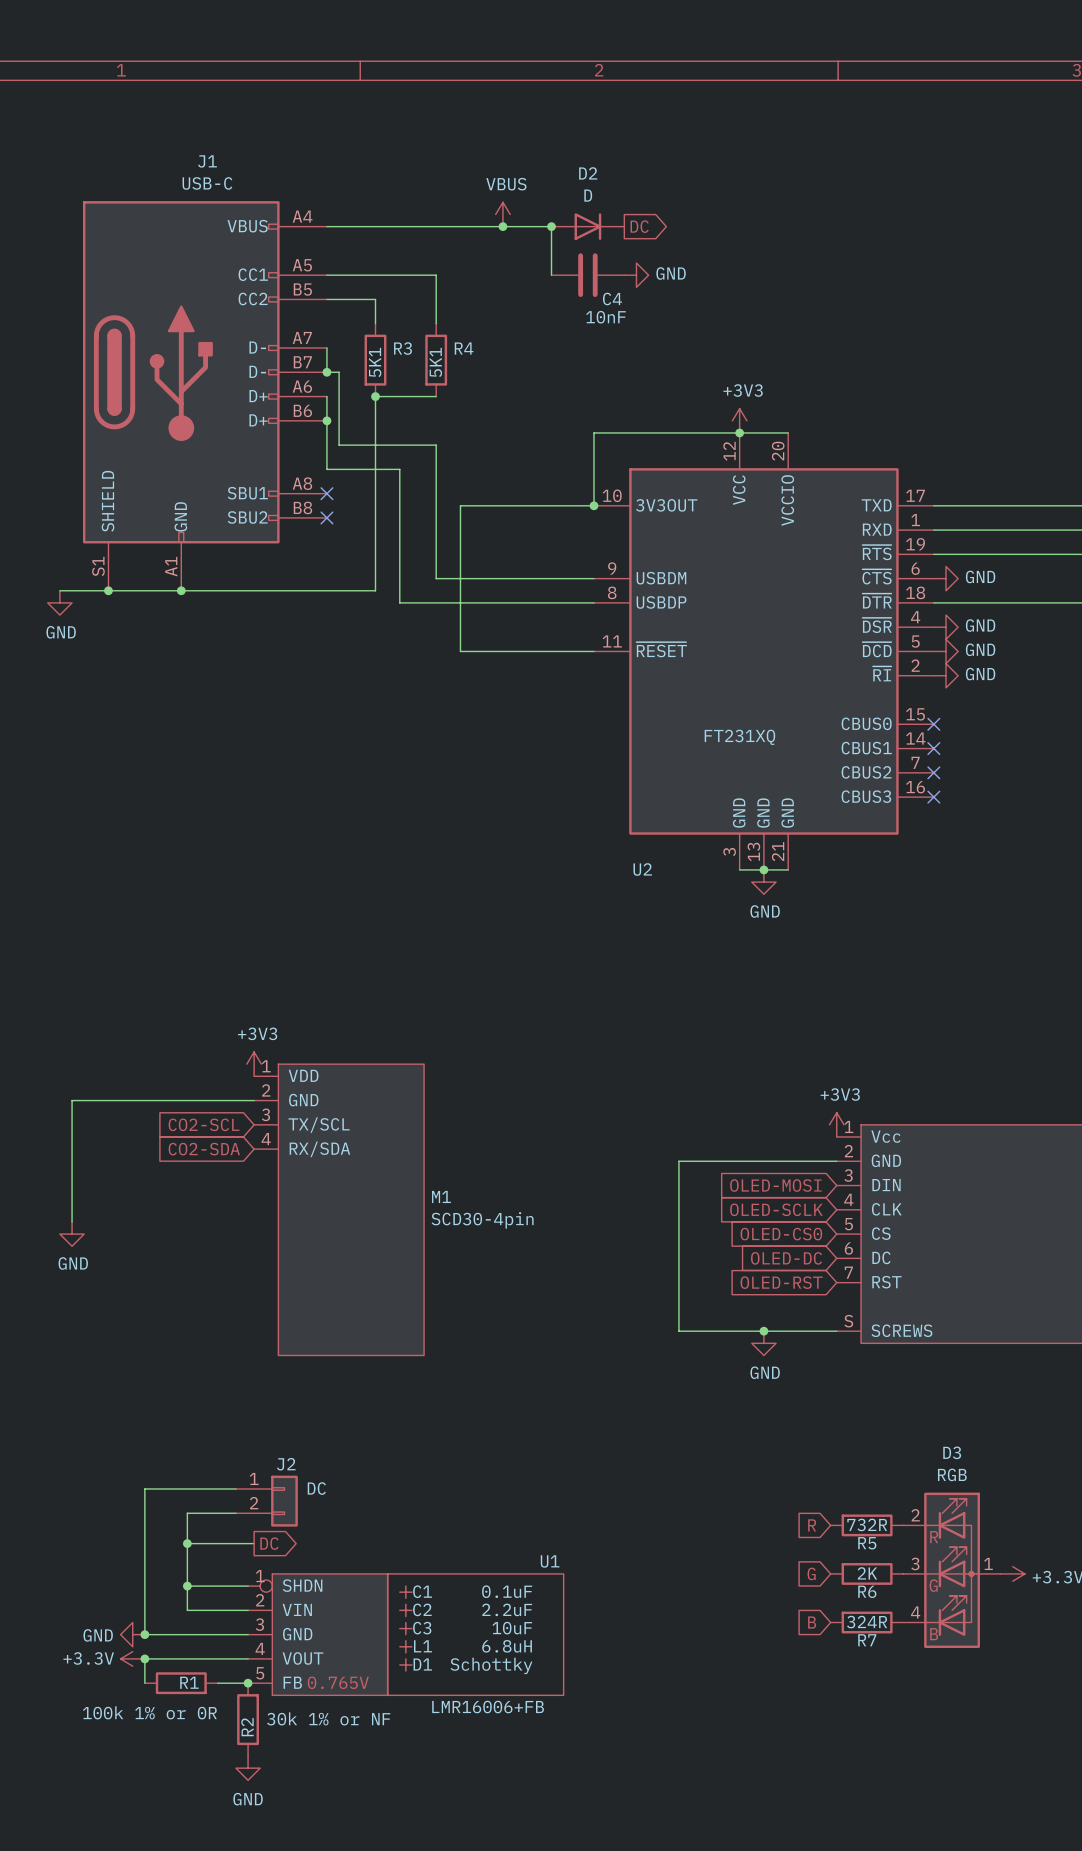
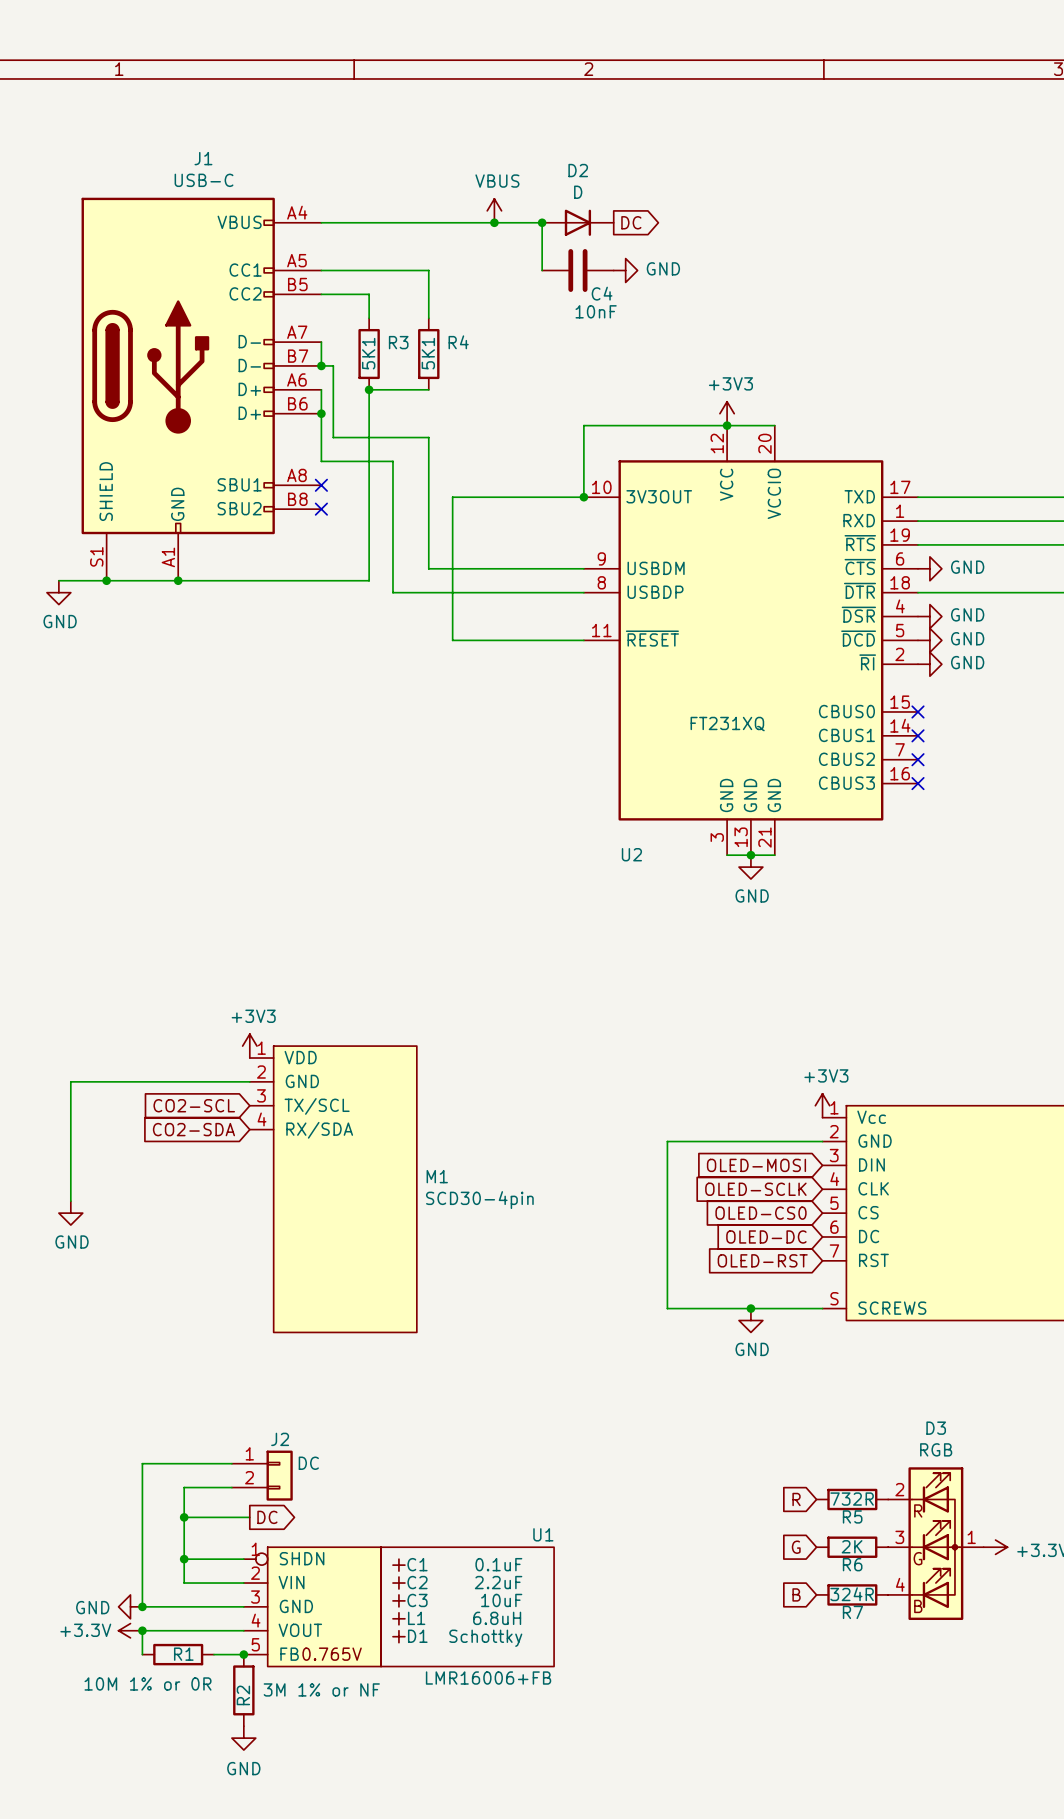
R1 value: 100k 1% or 0R (149, 1712) -> 10M 1% or 0R (148, 1683)
R2 value: 30k 1% or NF (328, 1718) -> 3M 1% or NF (321, 1689)

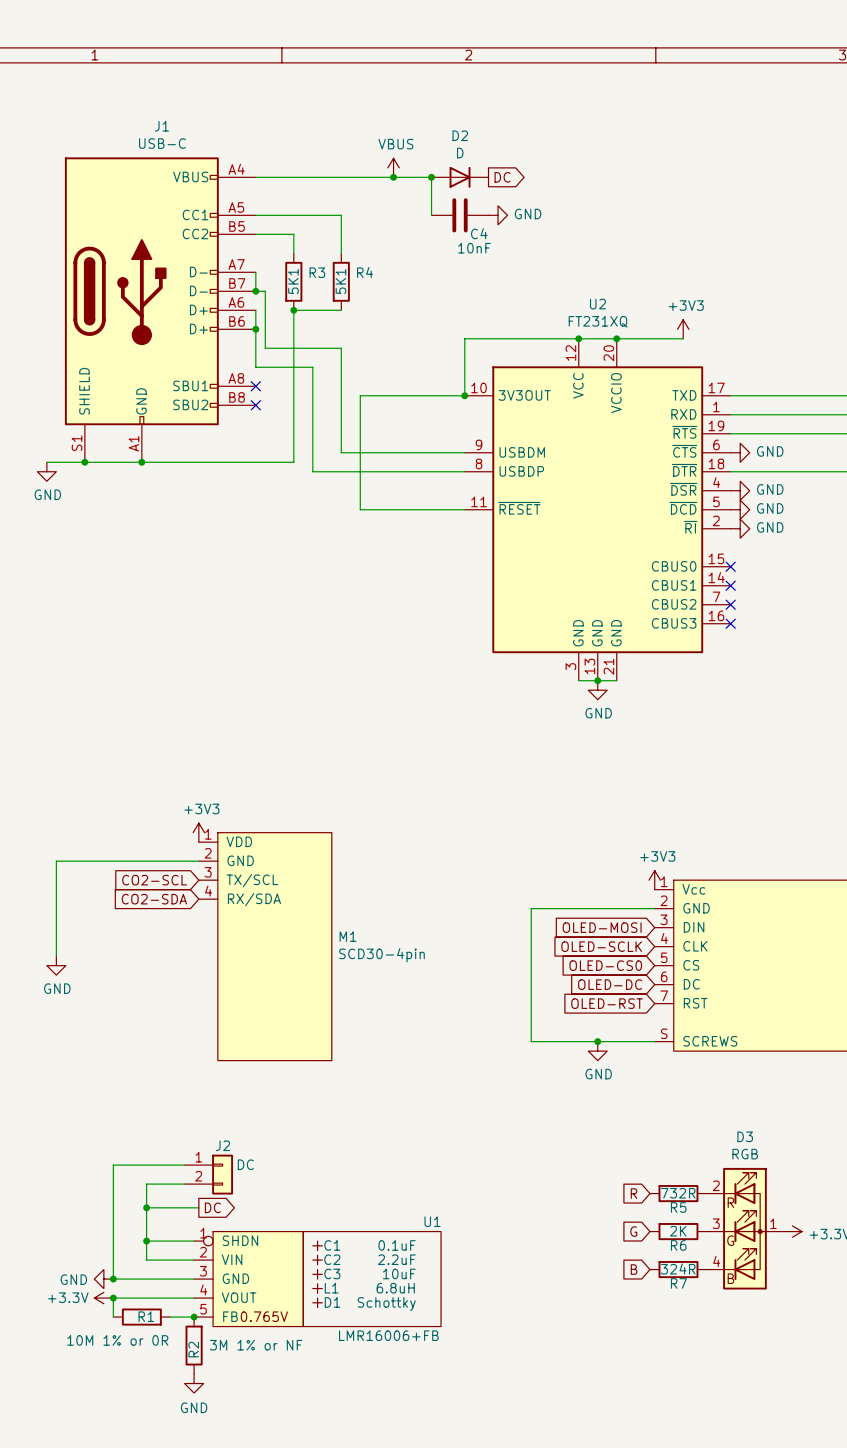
power symbol position: +3V3 (727, 413) -> +3V3 (683, 329)
wire: none -> (616, 338) (683, 338)
junction: none -> (616, 338)
U2 value position: FT231XQ (727, 724) -> FT231XQ (598, 321)
U2 name position: U2 (631, 854) -> U2 (597, 304)

